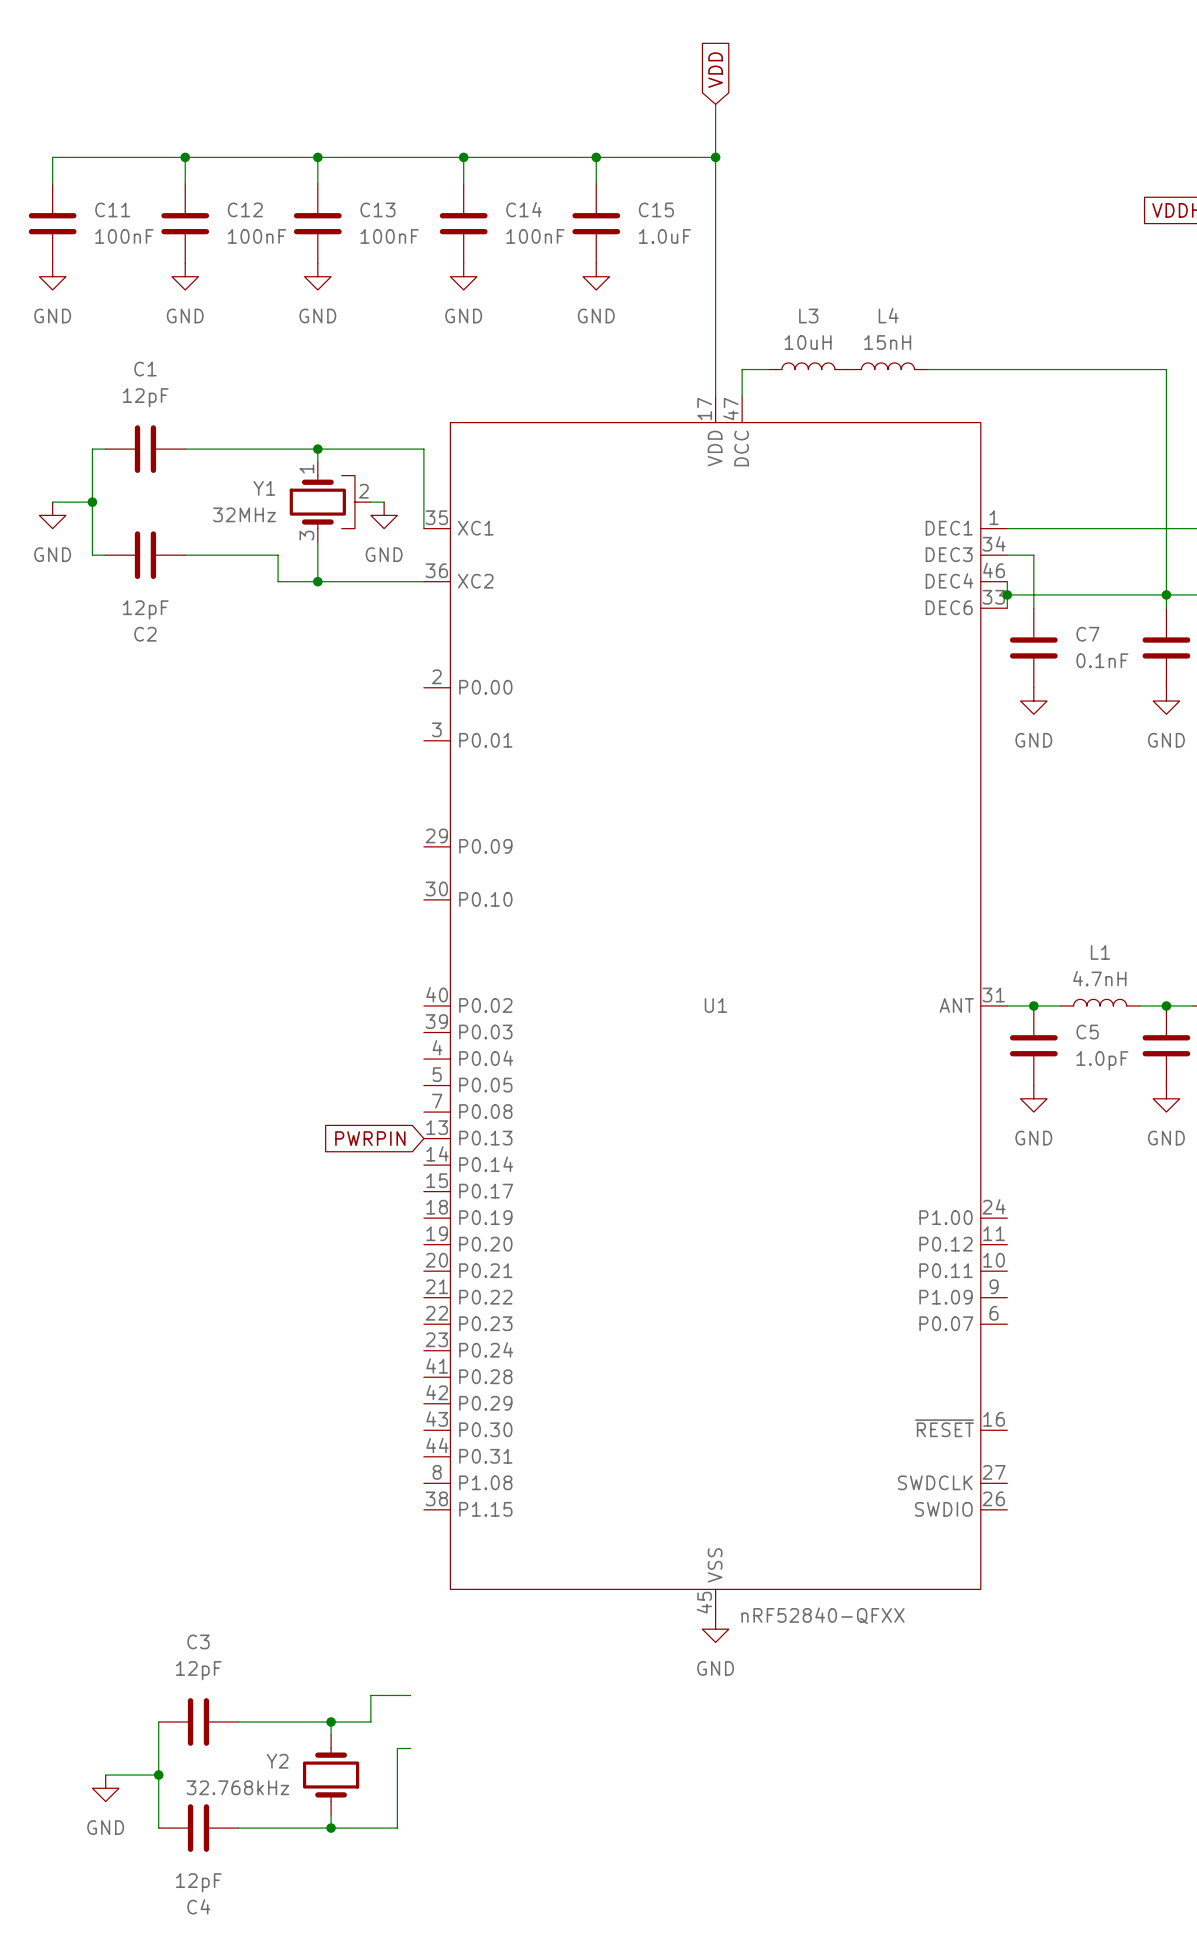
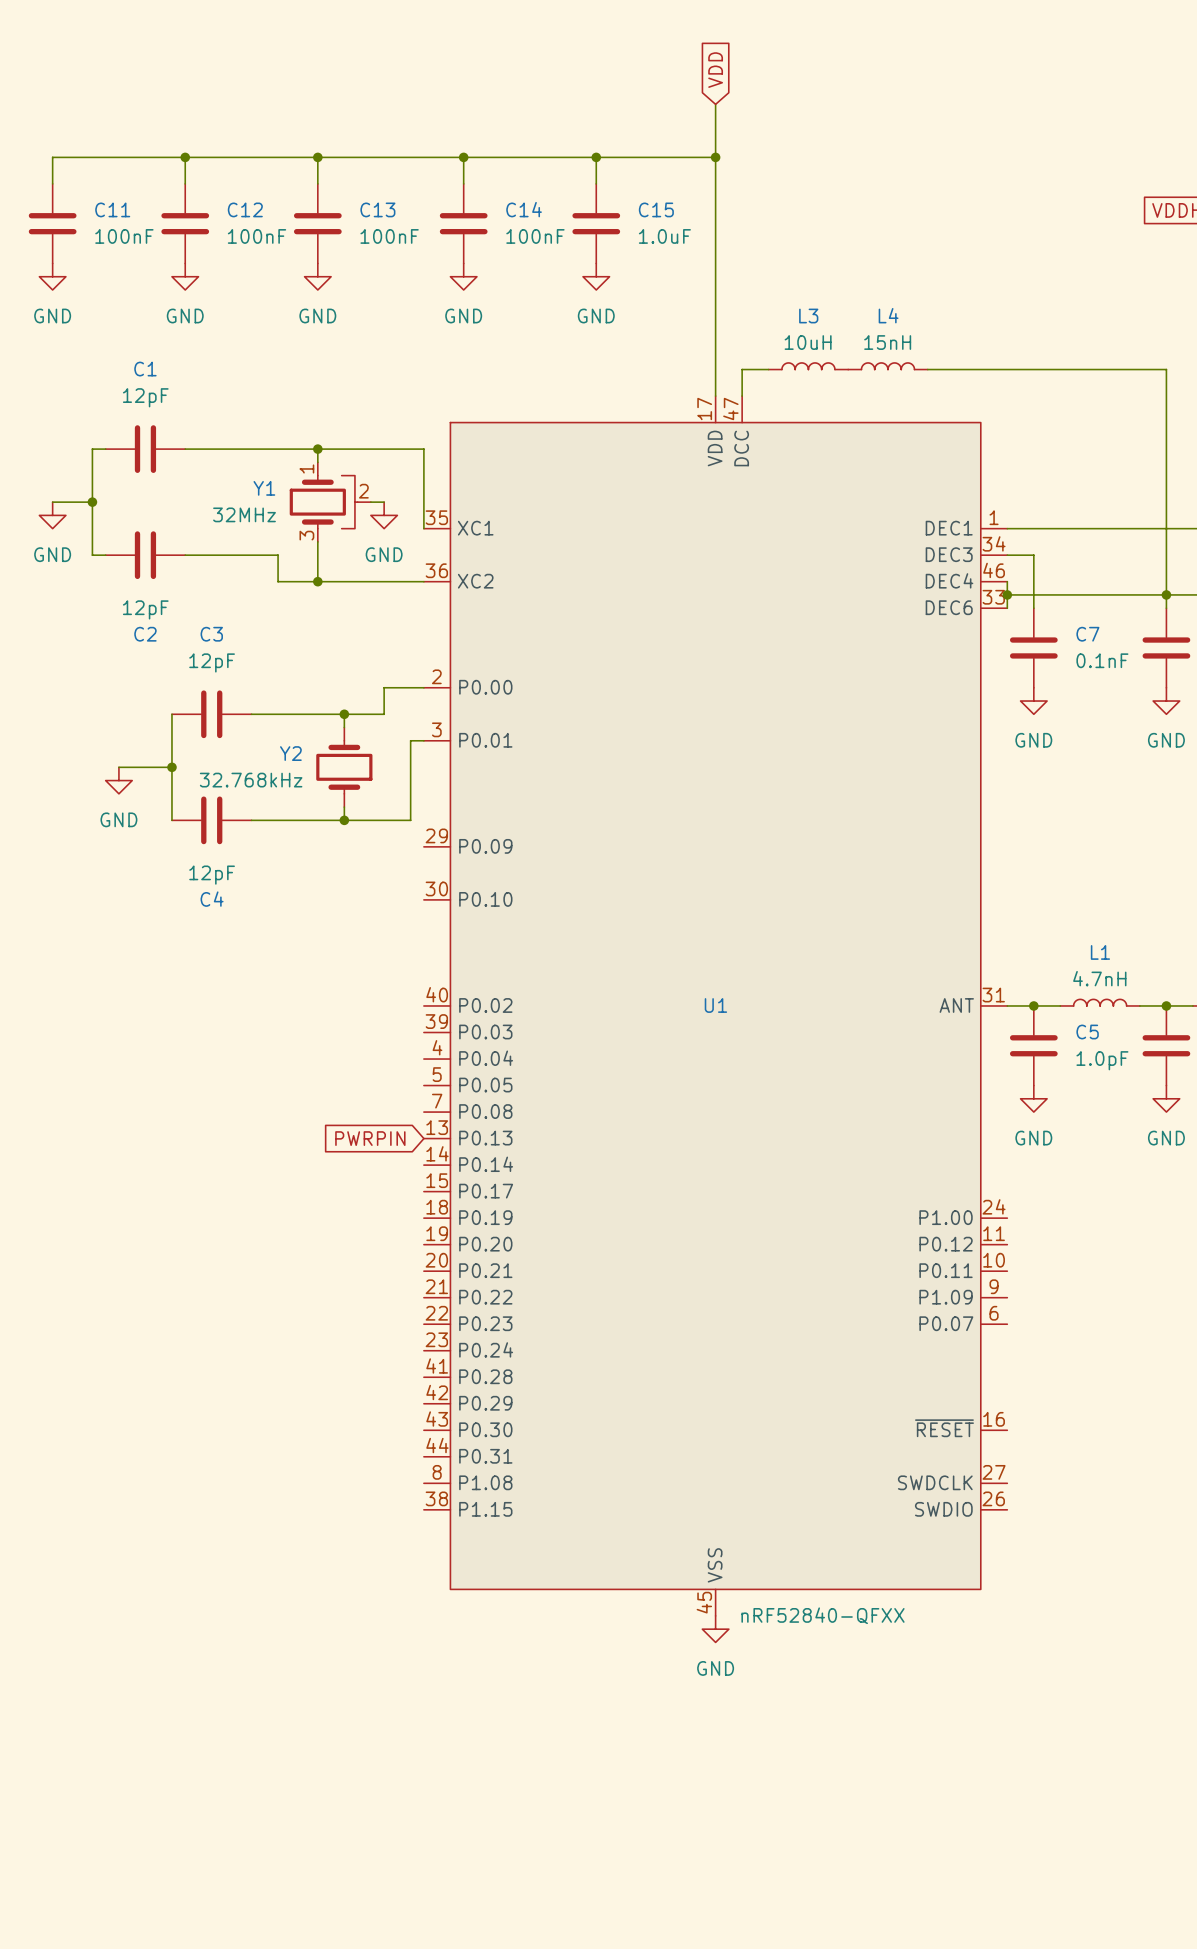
wire: none -> (423, 687) (384, 687) (384, 714) (251, 714)
wire: none -> (171, 714) (171, 820)
wire: none -> (344, 714) (344, 727)
junction: none -> (344, 714)
wire: none -> (423, 740) (410, 740) (410, 820) (251, 820)
wire: none -> (118, 767) (171, 767)
junction: none -> (171, 767)
power symbol: none -> GND (118, 780)
wire: none -> (344, 807) (344, 820)
junction: none -> (344, 820)
wire: (410, 1695) (370, 1695) (370, 1721) (238, 1721) -> none
wire: (158, 1721) (158, 1828) -> none
C3 position: (198, 1721) -> (211, 714)
wire: (331, 1721) (331, 1735) -> none
junction: (331, 1721) -> none
wire: (410, 1748) (397, 1748) (397, 1828) (238, 1828) -> none
wire: (105, 1775) (158, 1775) -> none
junction: (158, 1775) -> none
Y2 position: (331, 1775) -> (344, 767)
power symbol: GND (105, 1788) -> none
wire: (331, 1814) (331, 1828) -> none
C4 position: (198, 1828) -> (211, 820)
junction: (331, 1828) -> none

